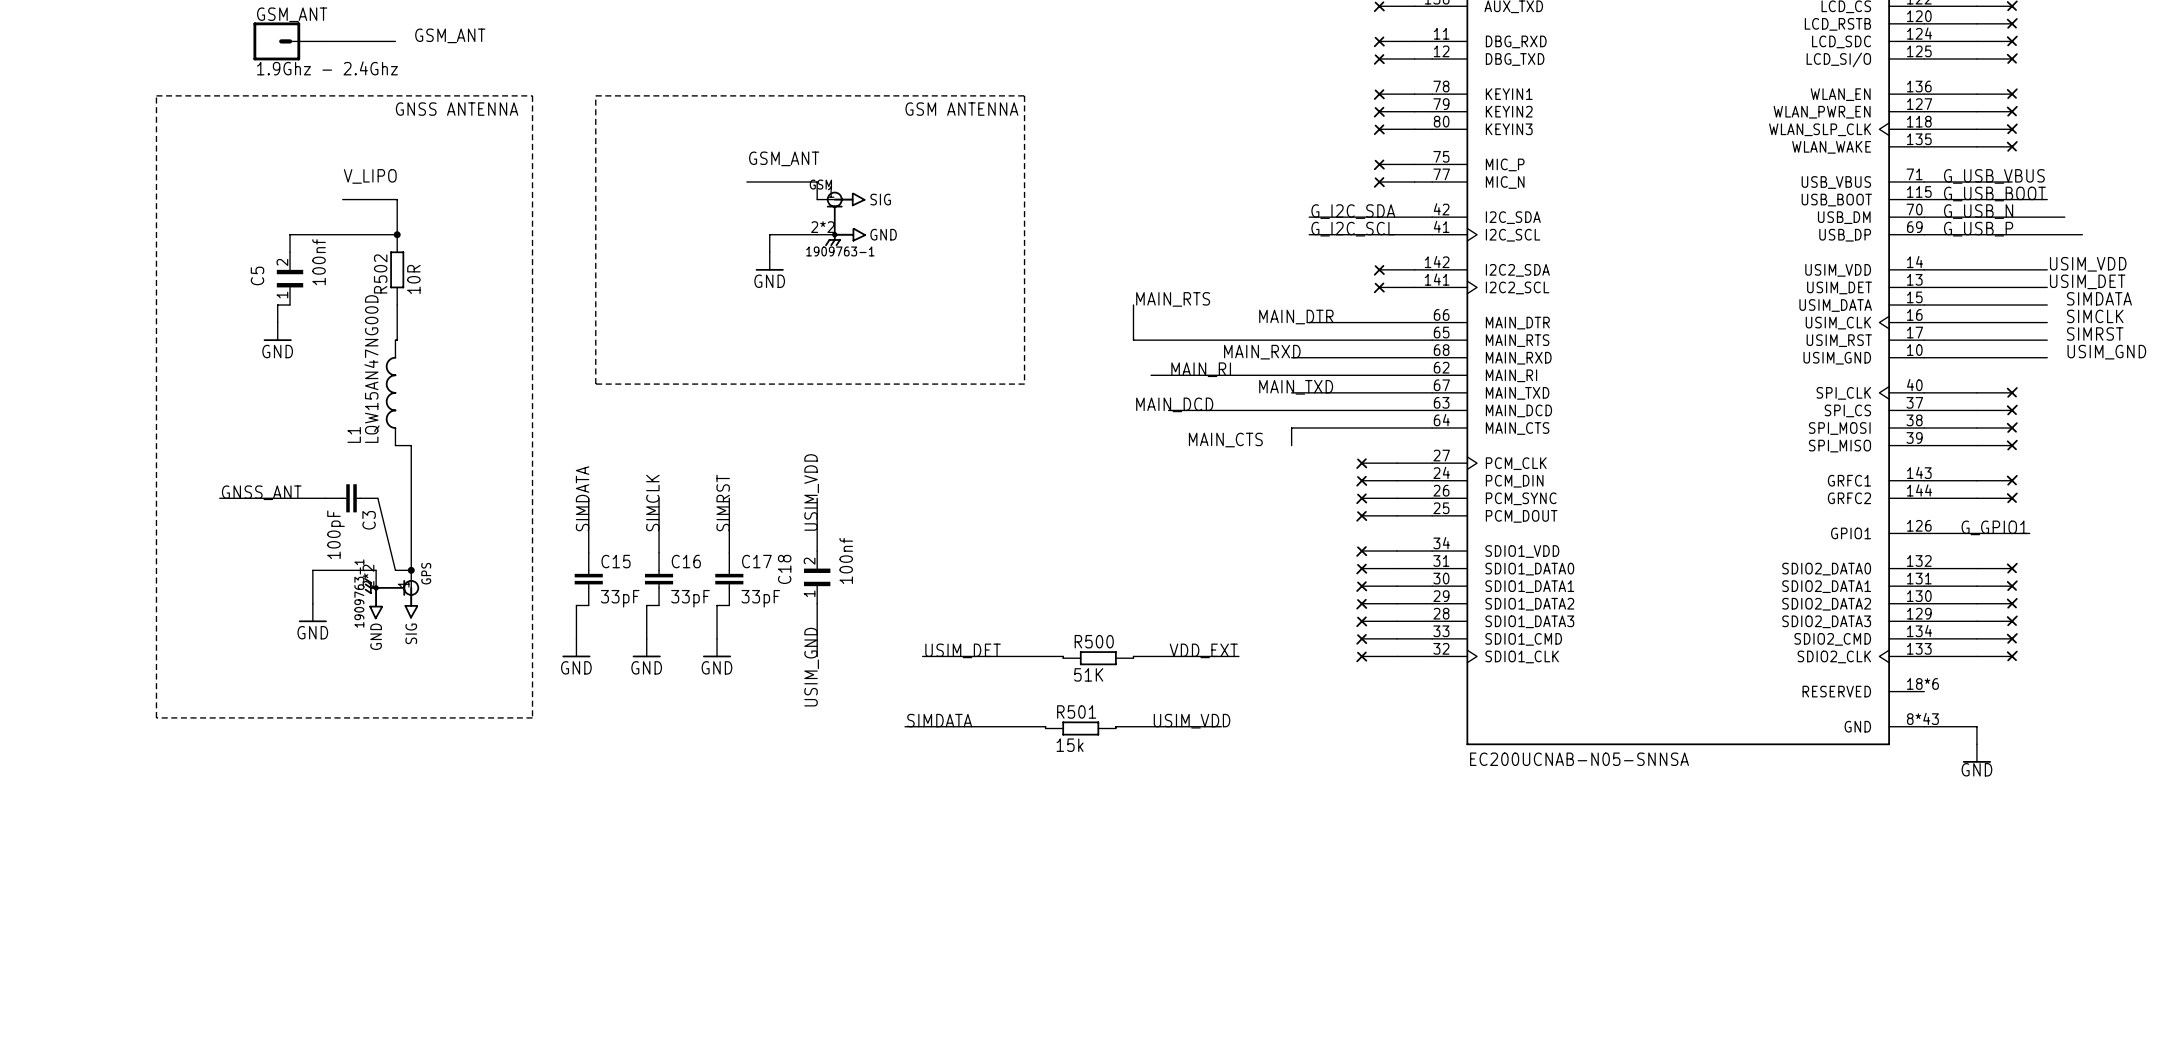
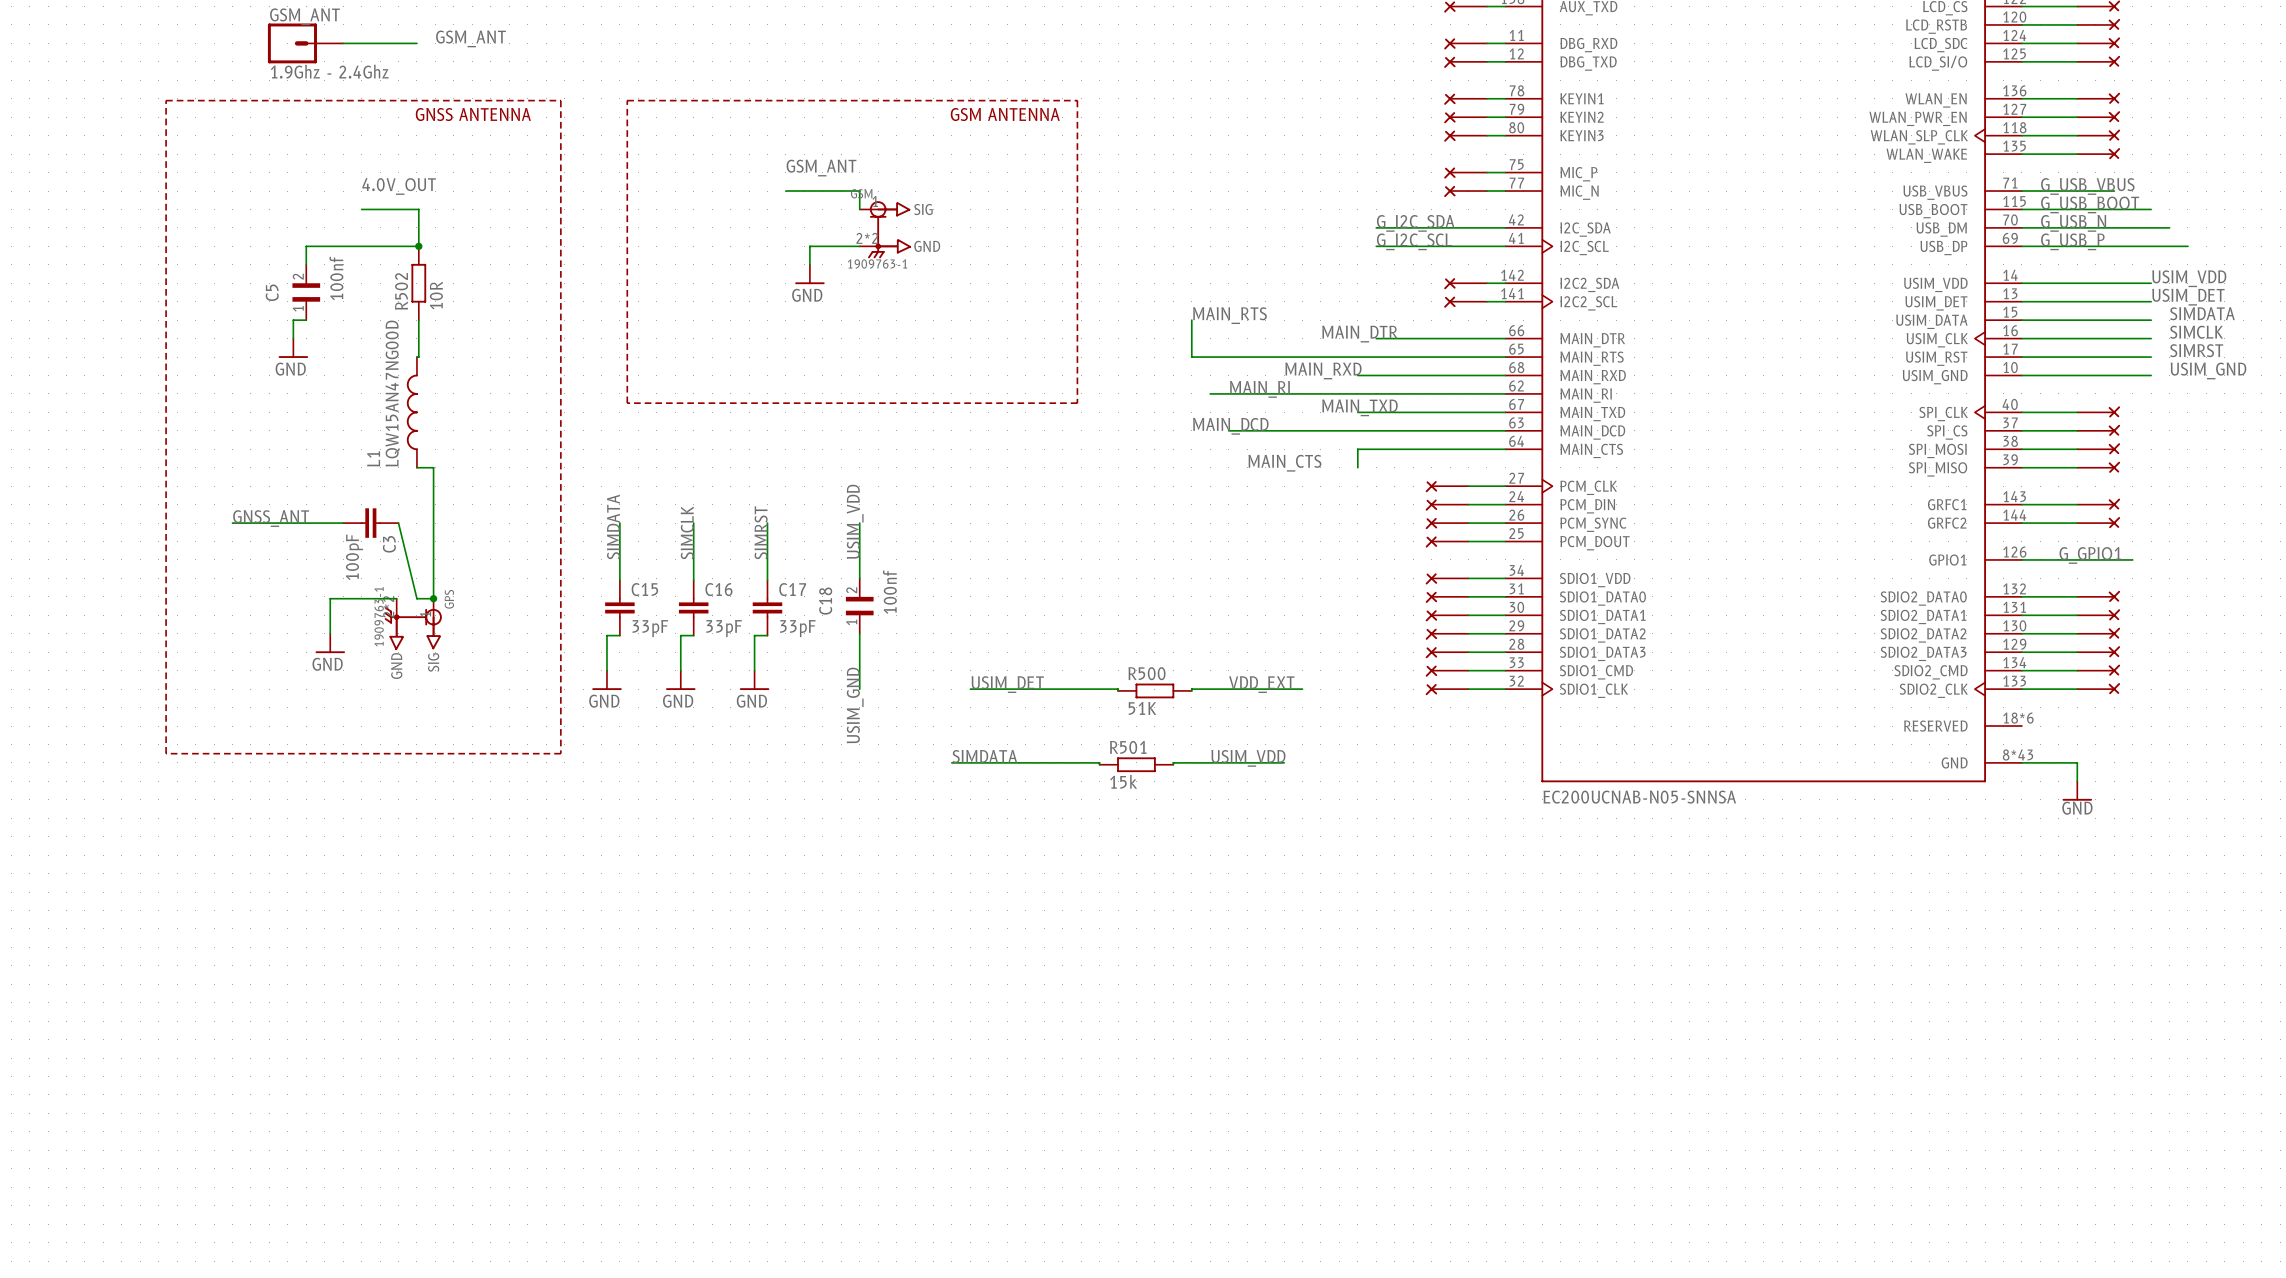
label: V_LIPO (370, 176) -> 4.0V_OUT (399, 186)

